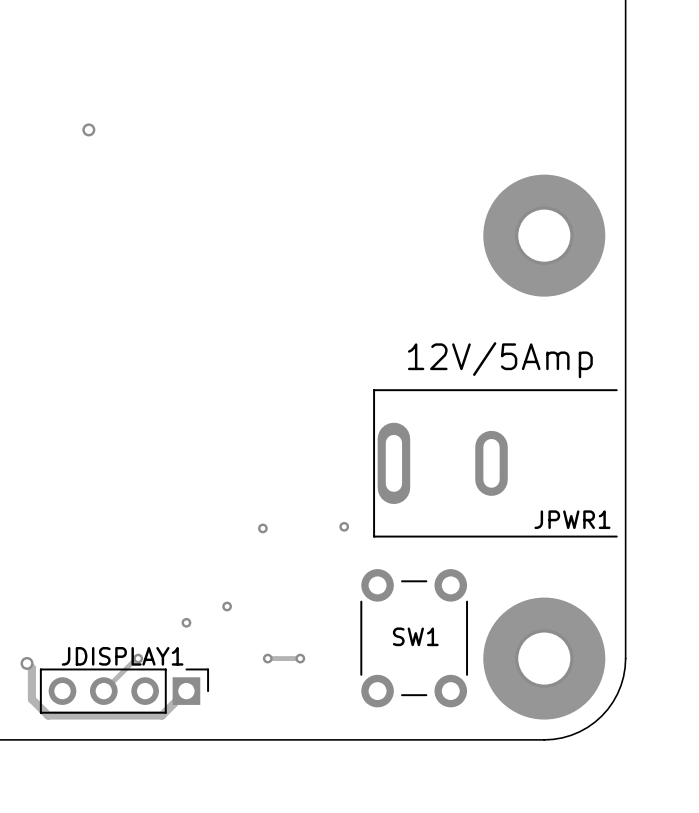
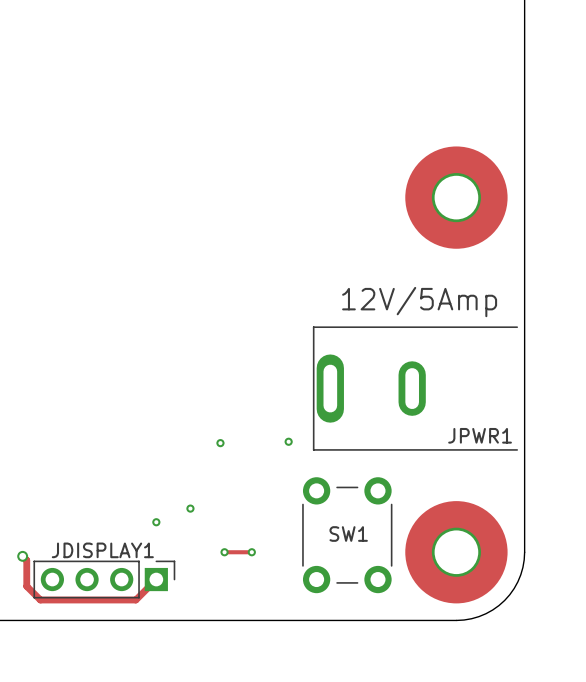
via: (88, 129) -> none
track: (138, 658) (103, 691) -> none
via: (138, 658) -> none

